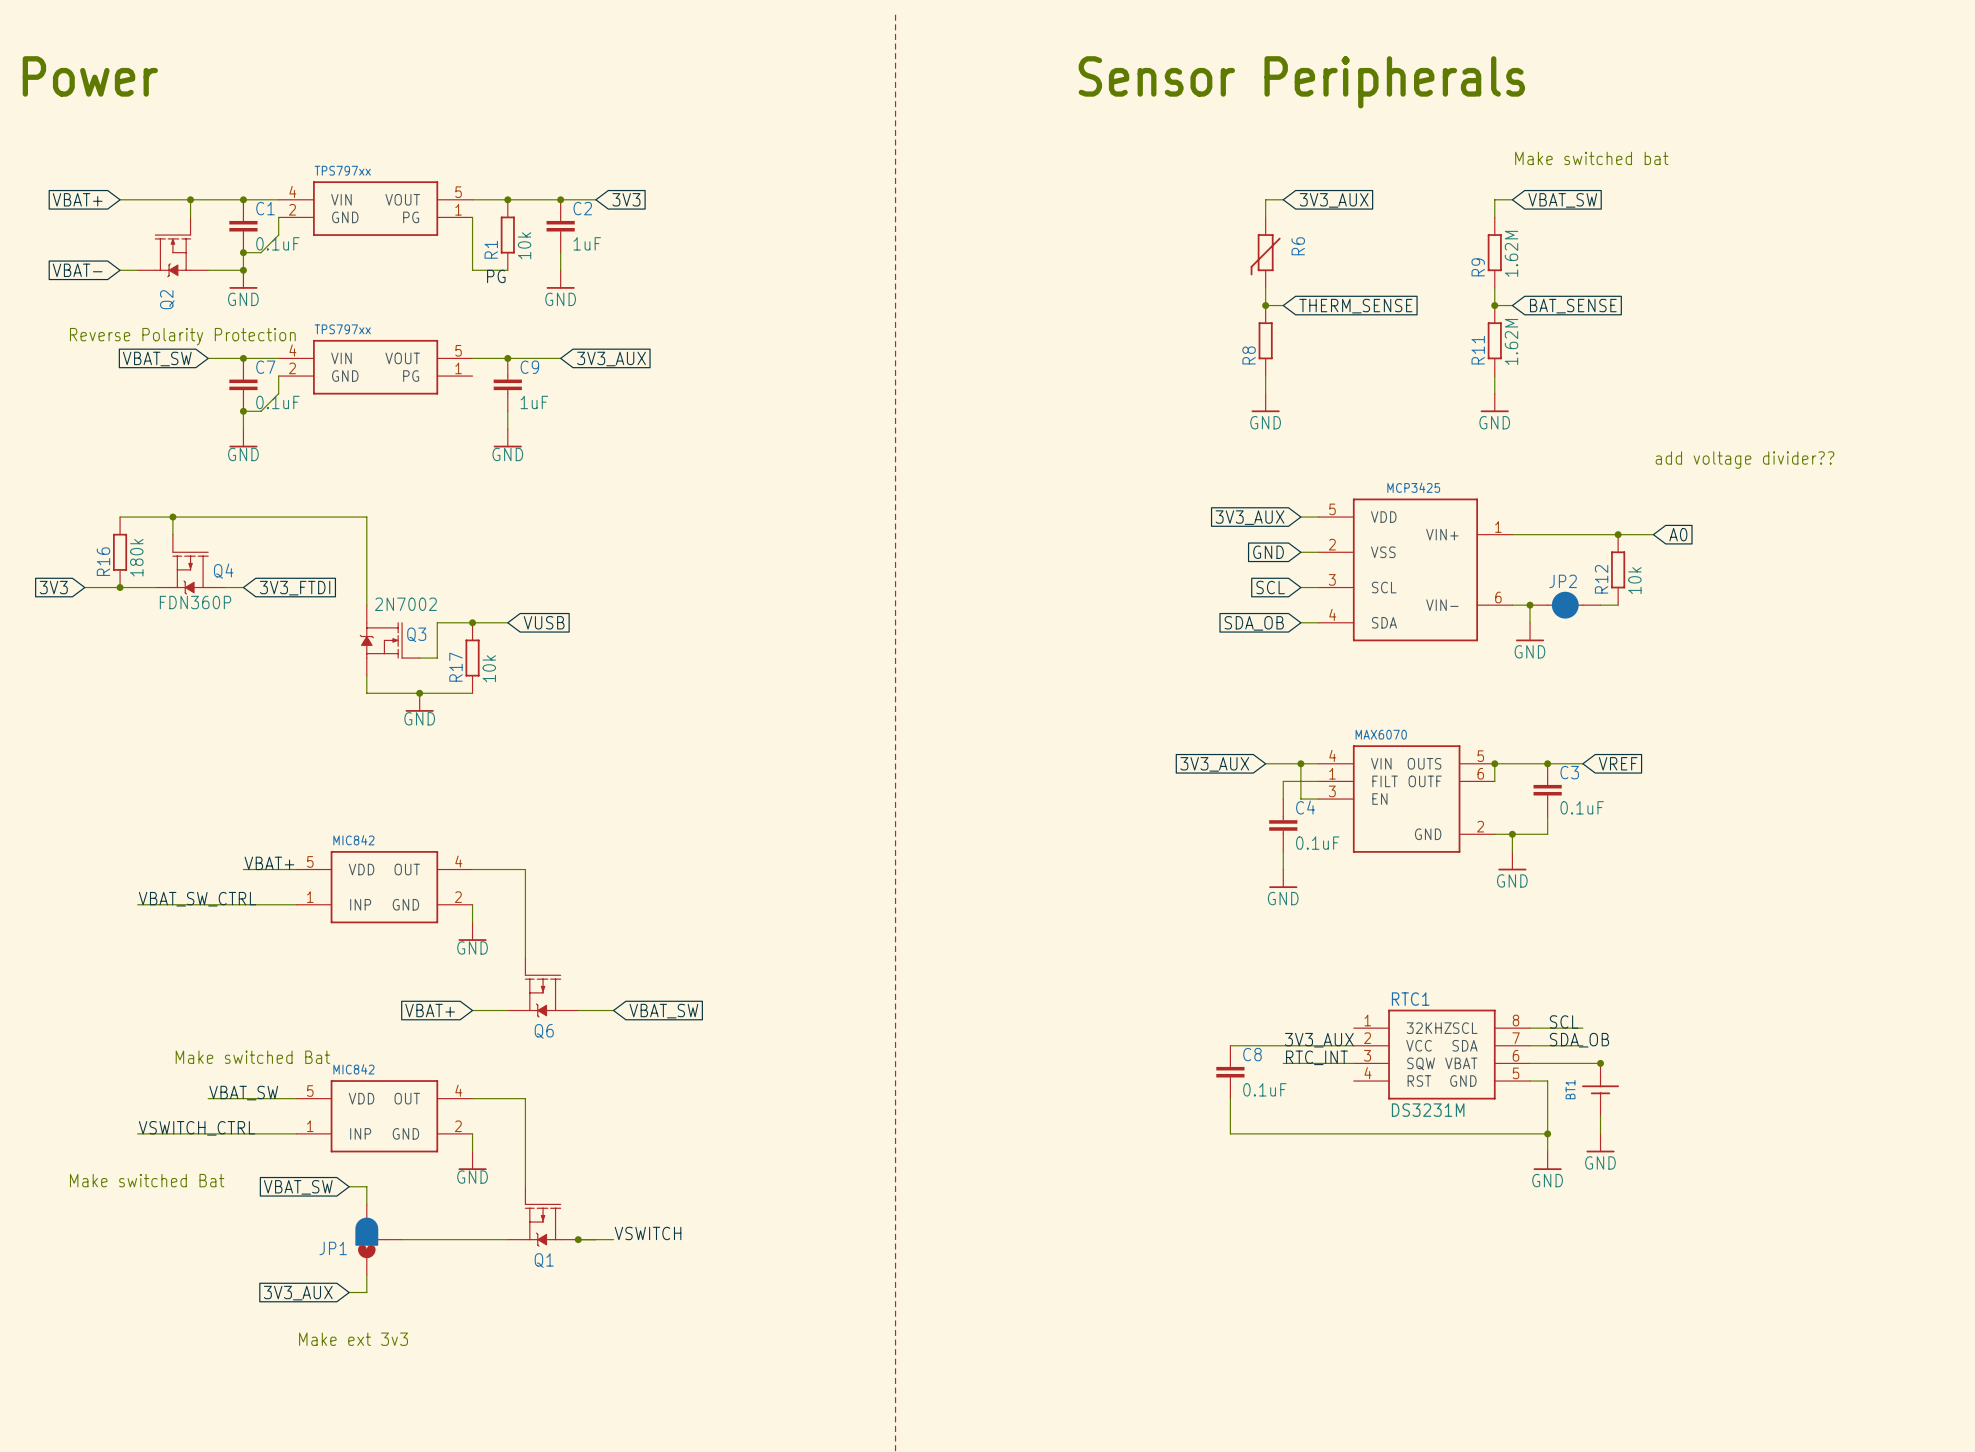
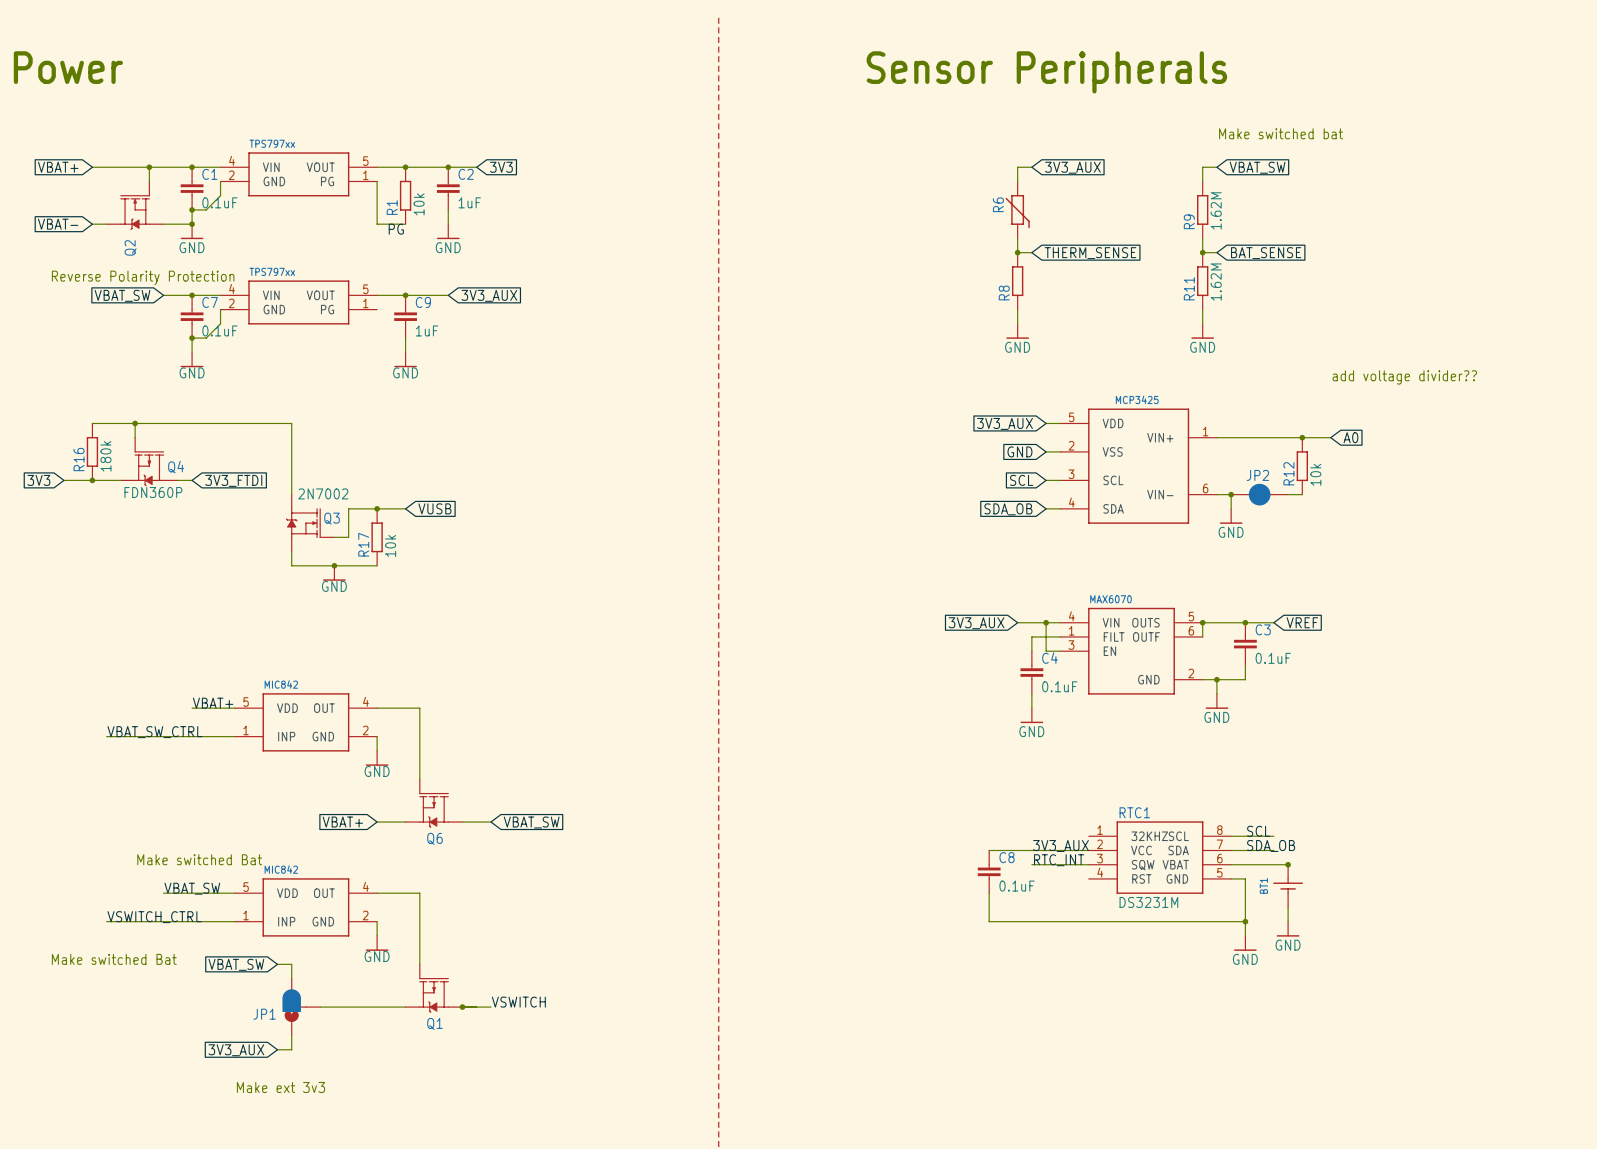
R6 flip: as is (1265, 254) -> left-right (1017, 211)

